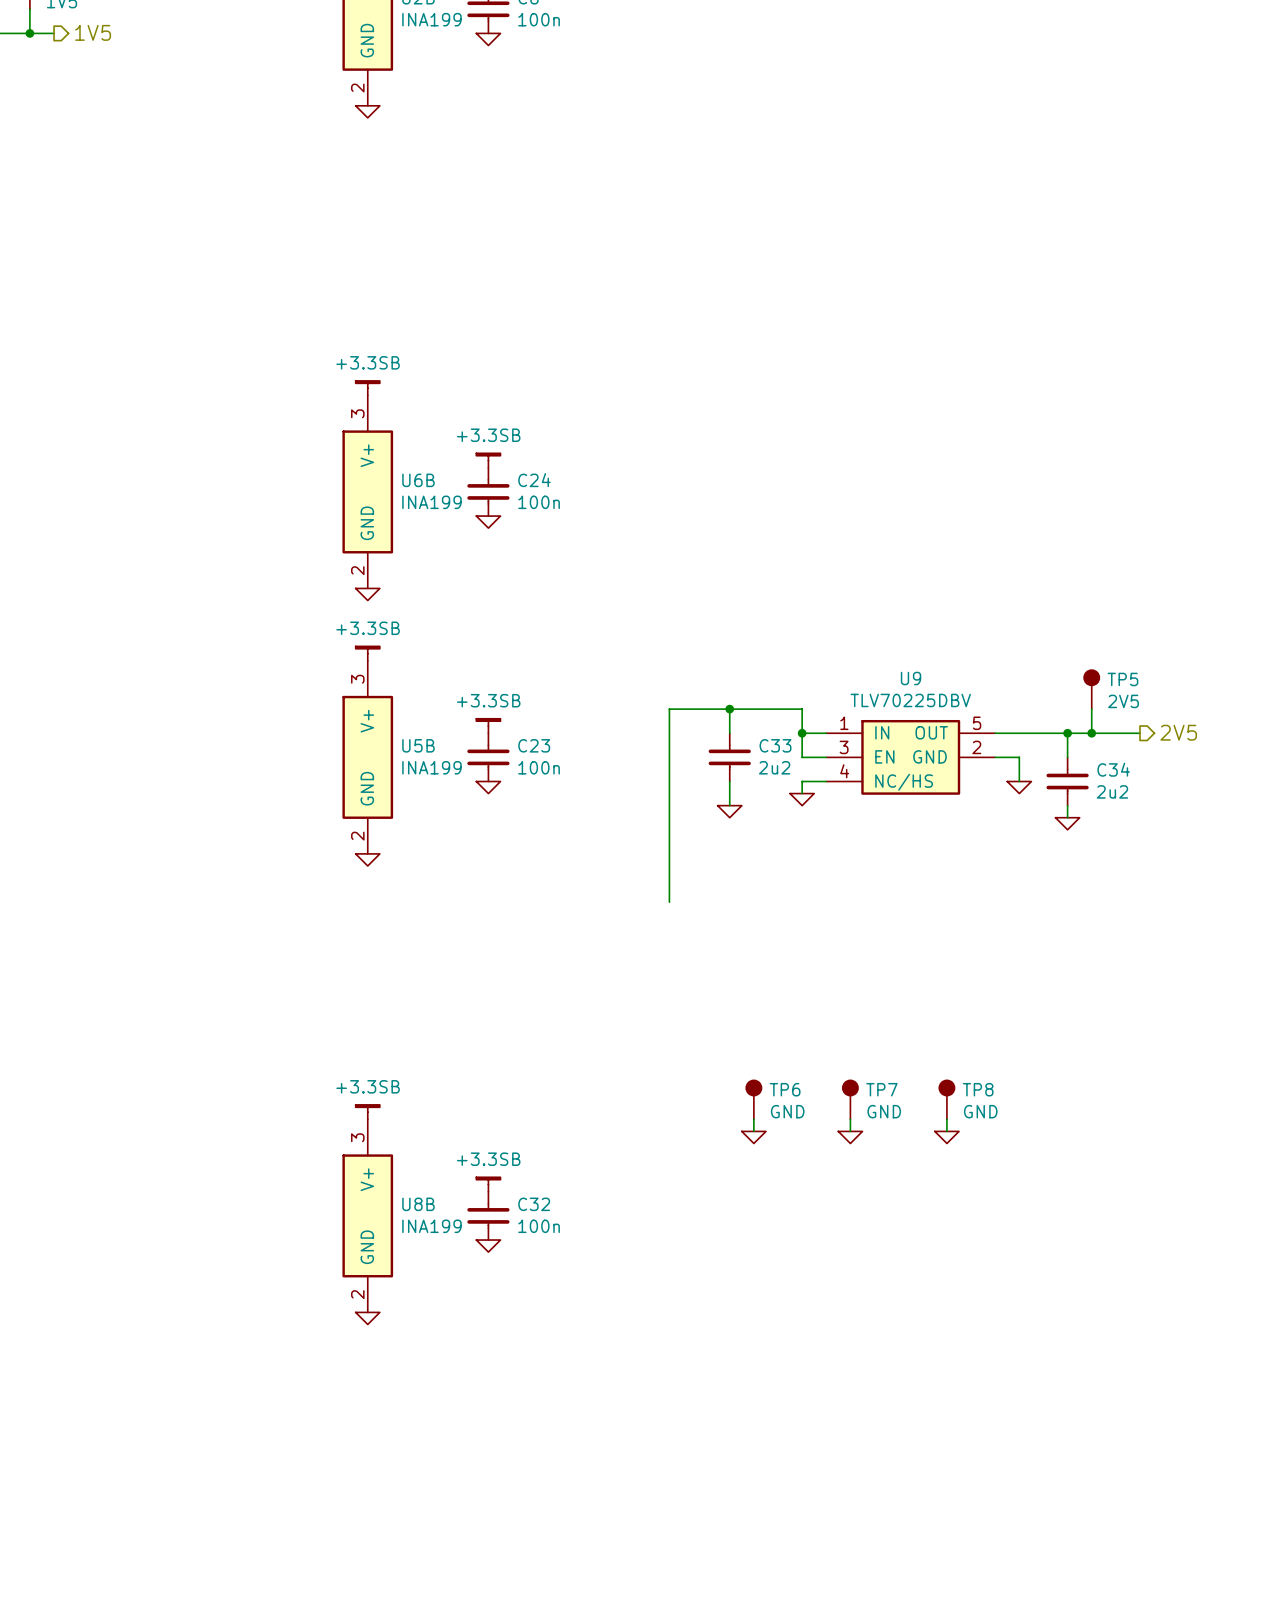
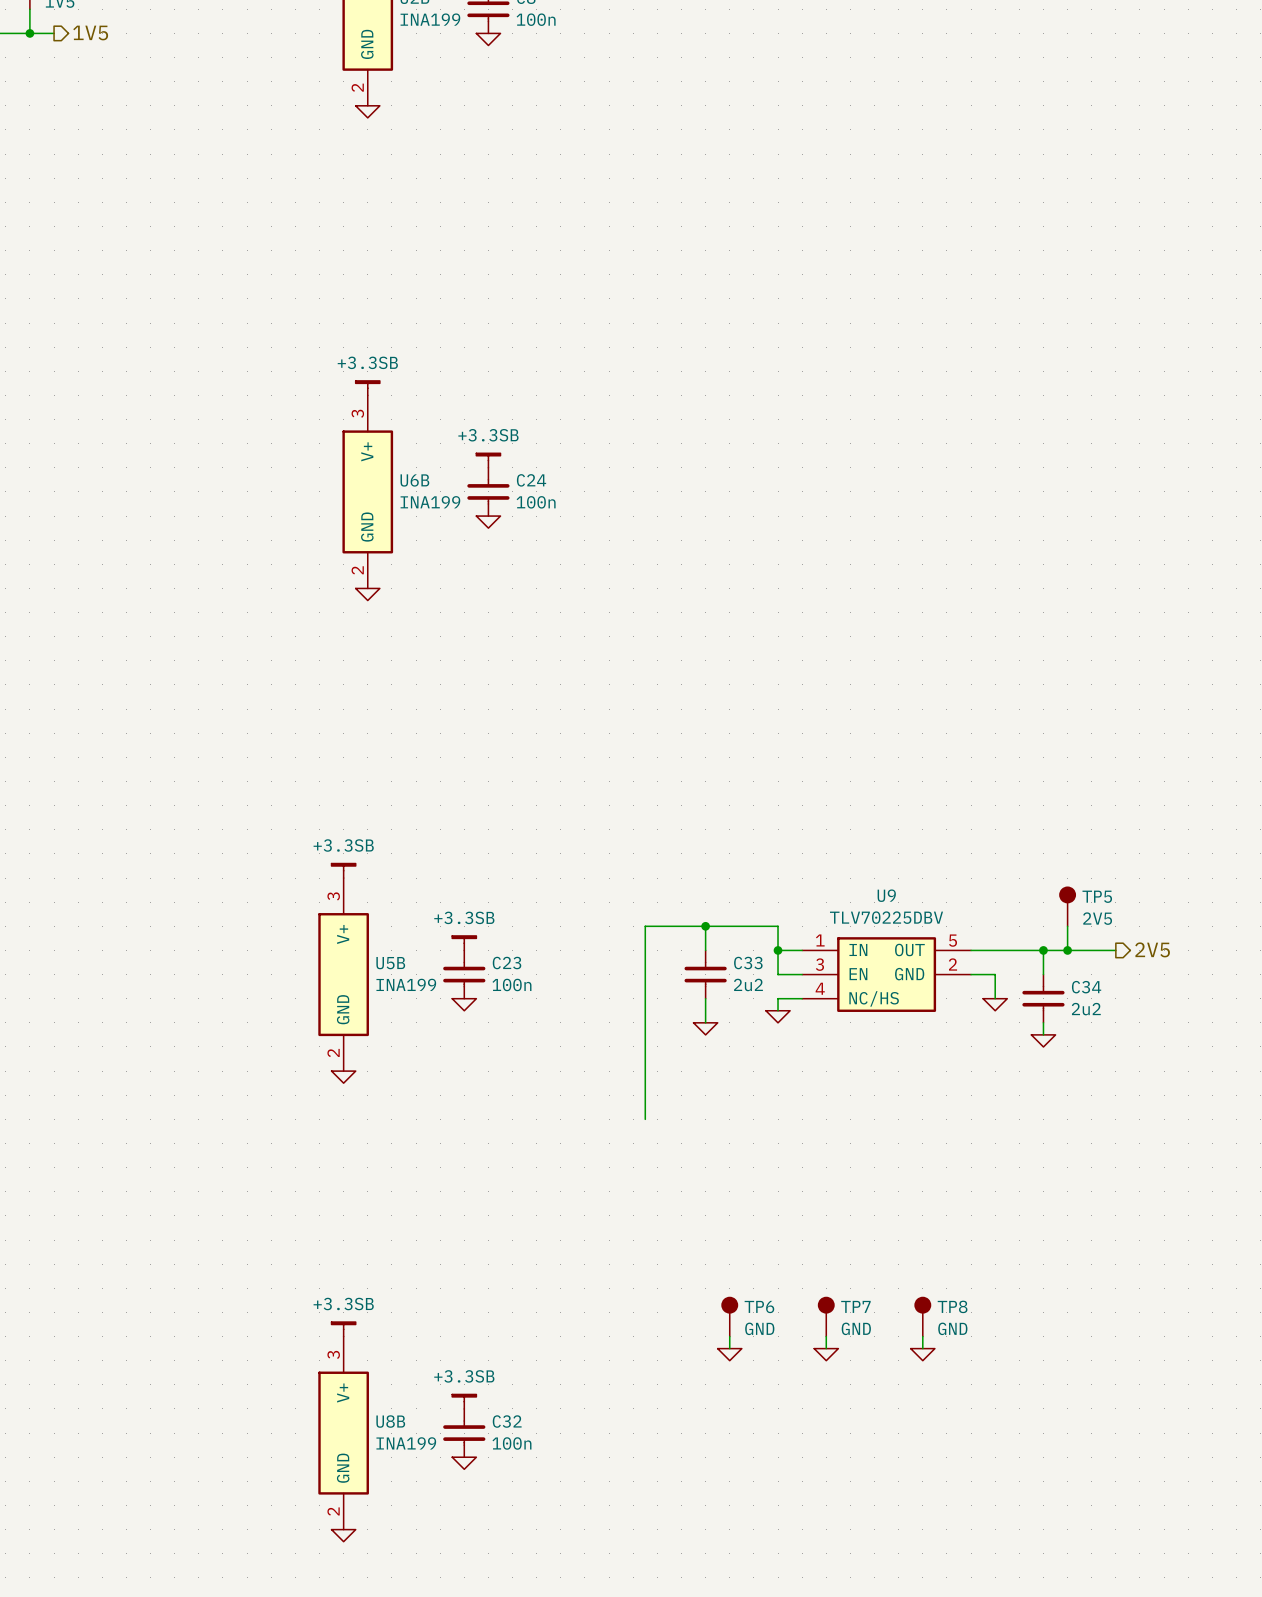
power symbol: +3.3SB (367, 653) -> none
TP5 position: (1091, 689) -> (1067, 906)
wire: (729, 709) (729, 733) -> (705, 926) (705, 950)
junction: (729, 709) -> none
wire: (1091, 709) (1091, 733) -> (1067, 926) (1067, 950)
power symbol: +3.3SB (488, 726) -> none
hierarchical label position: 2V5 (1178, 732) -> 2V5 (1152, 949)
wire: (802, 733) (826, 733) -> (778, 950) (802, 950)
junction: (802, 733) -> none
wire: (995, 733) (1139, 733) -> (971, 950) (1115, 950)
wire: (1067, 733) (1067, 757) -> (1043, 950) (1043, 974)
junction: (1067, 733) -> none
junction: (1091, 733) -> none
U5B position: (367, 757) -> (343, 974)
C23 position: (488, 757) -> (464, 974)
C33 position: (729, 757) -> (705, 974)
wire: (826, 757) (802, 757) (802, 709) (669, 709) (669, 902) -> (802, 974) (778, 974) (778, 926) (645, 926) (645, 1119)
U9 position: (910, 757) -> (886, 974)
wire: (995, 757) (1019, 757) (1019, 781) -> (971, 974) (995, 974) (995, 998)
wire: (729, 781) (729, 805) -> (705, 998) (705, 1022)
wire: (826, 781) (802, 781) (802, 793) -> (802, 998) (778, 998) (778, 1010)
C34 position: (1067, 781) -> (1043, 998)
power symbol: (488, 787) -> none
power symbol: (1019, 787) -> none
power symbol: (802, 799) -> none
wire: (1067, 805) (1067, 817) -> (1043, 1022) (1043, 1034)
power symbol: (729, 811) -> none
power symbol: (1067, 823) -> none
power symbol: (367, 859) -> none
power symbol: none -> +3.3SB (343, 870)
junction: none -> (705, 926)
power symbol: none -> +3.3SB (464, 943)
junction: none -> (778, 950)
junction: none -> (1043, 950)
junction: none -> (1067, 950)
power symbol: none -> (464, 1004)
power symbol: none -> (995, 1004)
power symbol: none -> (778, 1016)
power symbol: none -> (705, 1028)
power symbol: none -> (1043, 1040)
power symbol: none -> (343, 1077)
TP6 position: (753, 1099) -> (729, 1316)
TP7 position: (850, 1099) -> (826, 1316)
TP8 position: (946, 1099) -> (922, 1316)
power symbol: +3.3SB (367, 1112) -> none
wire: (753, 1119) (753, 1131) -> (729, 1336) (729, 1348)
wire: (850, 1119) (850, 1131) -> (826, 1336) (826, 1348)
wire: (946, 1119) (946, 1131) -> (922, 1336) (922, 1348)
power symbol: (753, 1137) -> none
power symbol: (850, 1137) -> none
power symbol: (946, 1137) -> none
power symbol: +3.3SB (488, 1184) -> none
U8B position: (367, 1215) -> (343, 1433)
C32 position: (488, 1215) -> (464, 1433)
power symbol: (488, 1246) -> none
power symbol: (367, 1318) -> none
power symbol: none -> +3.3SB (343, 1329)
power symbol: none -> (729, 1354)
power symbol: none -> (826, 1354)
power symbol: none -> (922, 1354)
power symbol: none -> +3.3SB (464, 1401)
power symbol: none -> (464, 1463)
power symbol: none -> (343, 1535)

